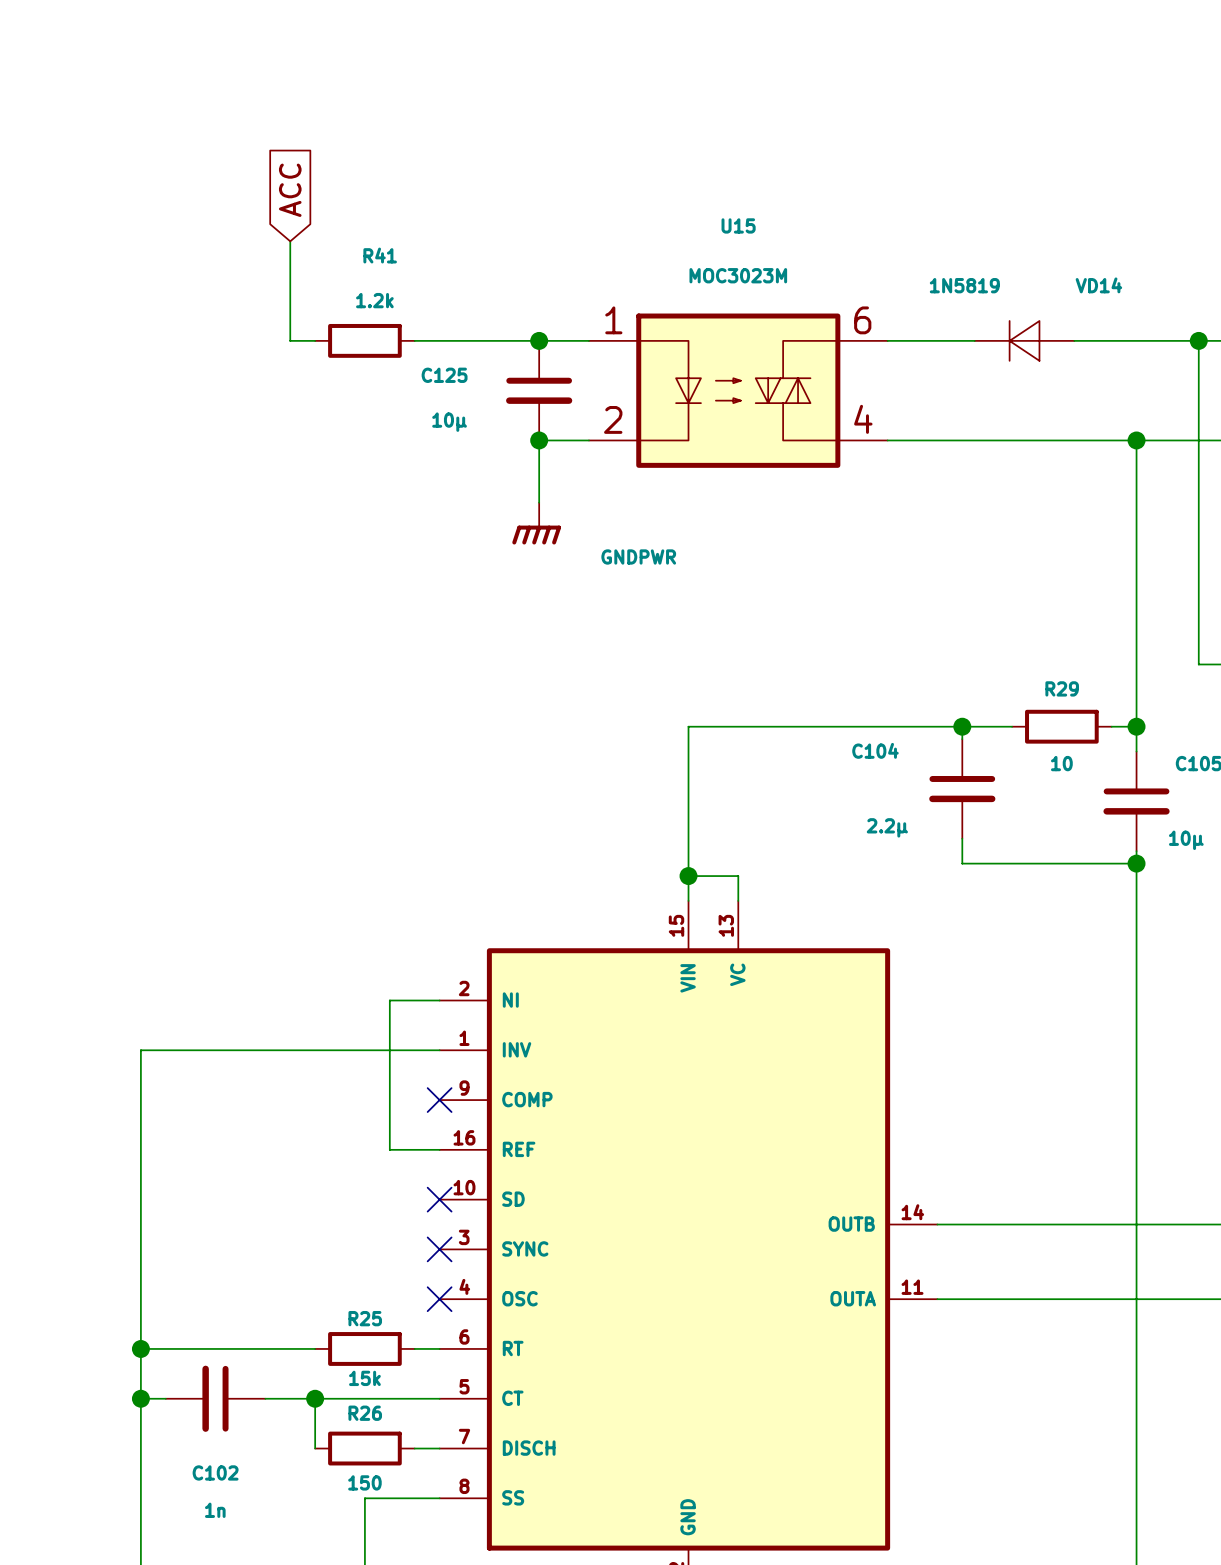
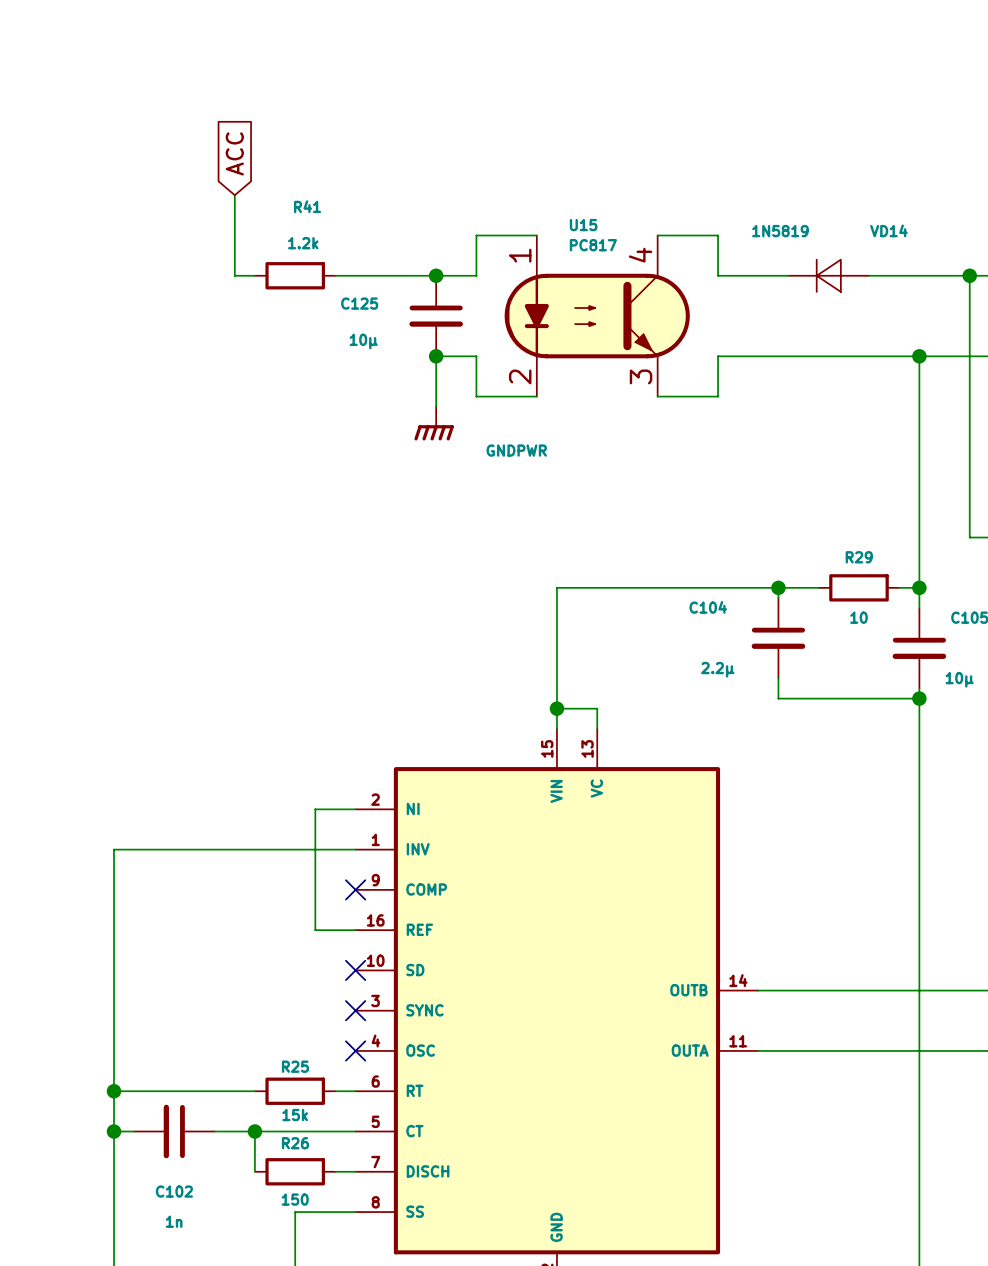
U15 name position: U15 (738, 225) -> U15 (583, 225)
U15 value: MOC3023M (738, 275) -> PC817 (593, 245)
wire: none -> (536, 235) (476, 235) (476, 275)
wire: none -> (657, 235) (718, 235) (718, 275)
U15 symbol: [588, 313, 888, 468] -> [504, 235, 690, 397]
wire: none -> (476, 356) (476, 396) (536, 396)
wire: none -> (718, 356) (718, 396) (657, 396)

